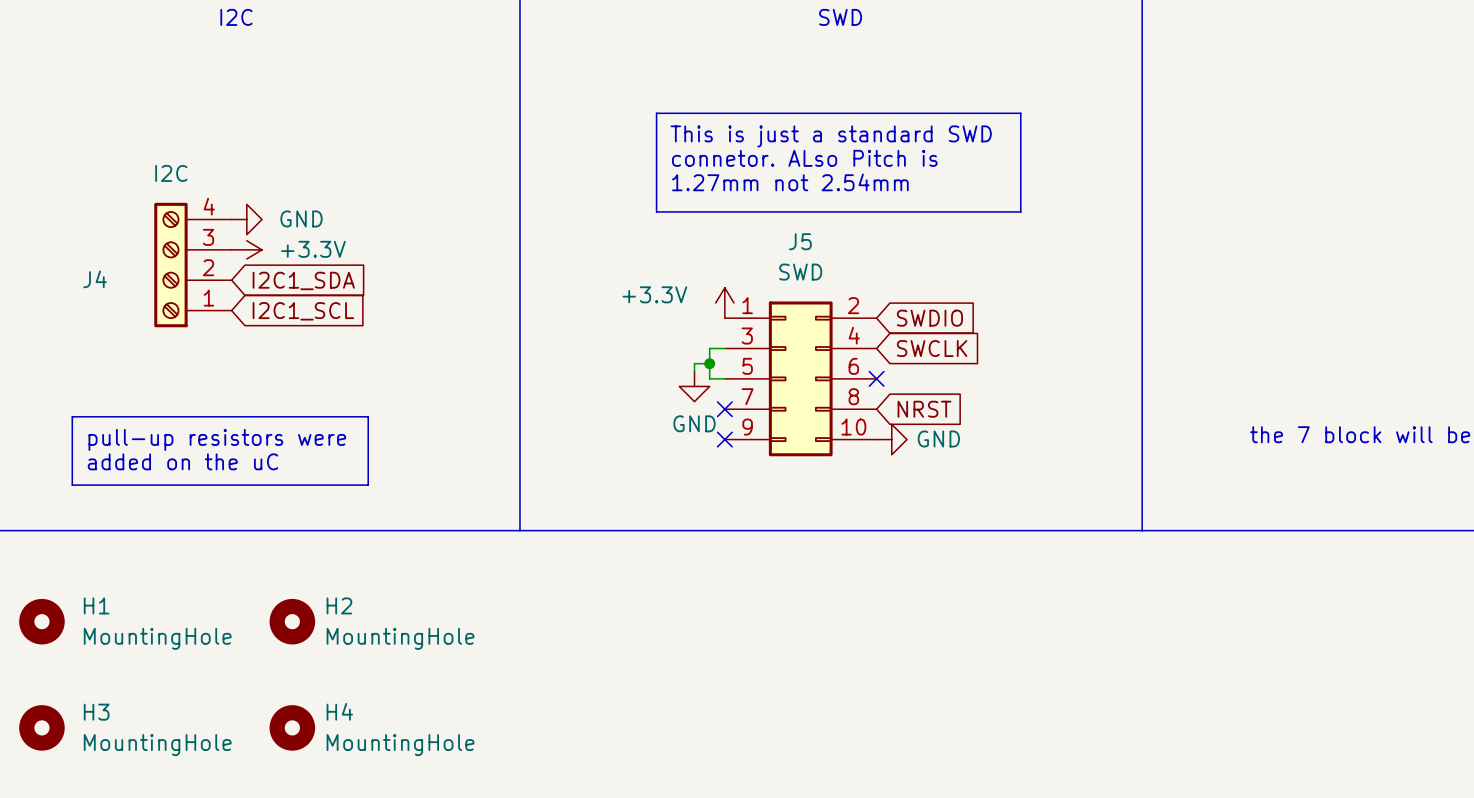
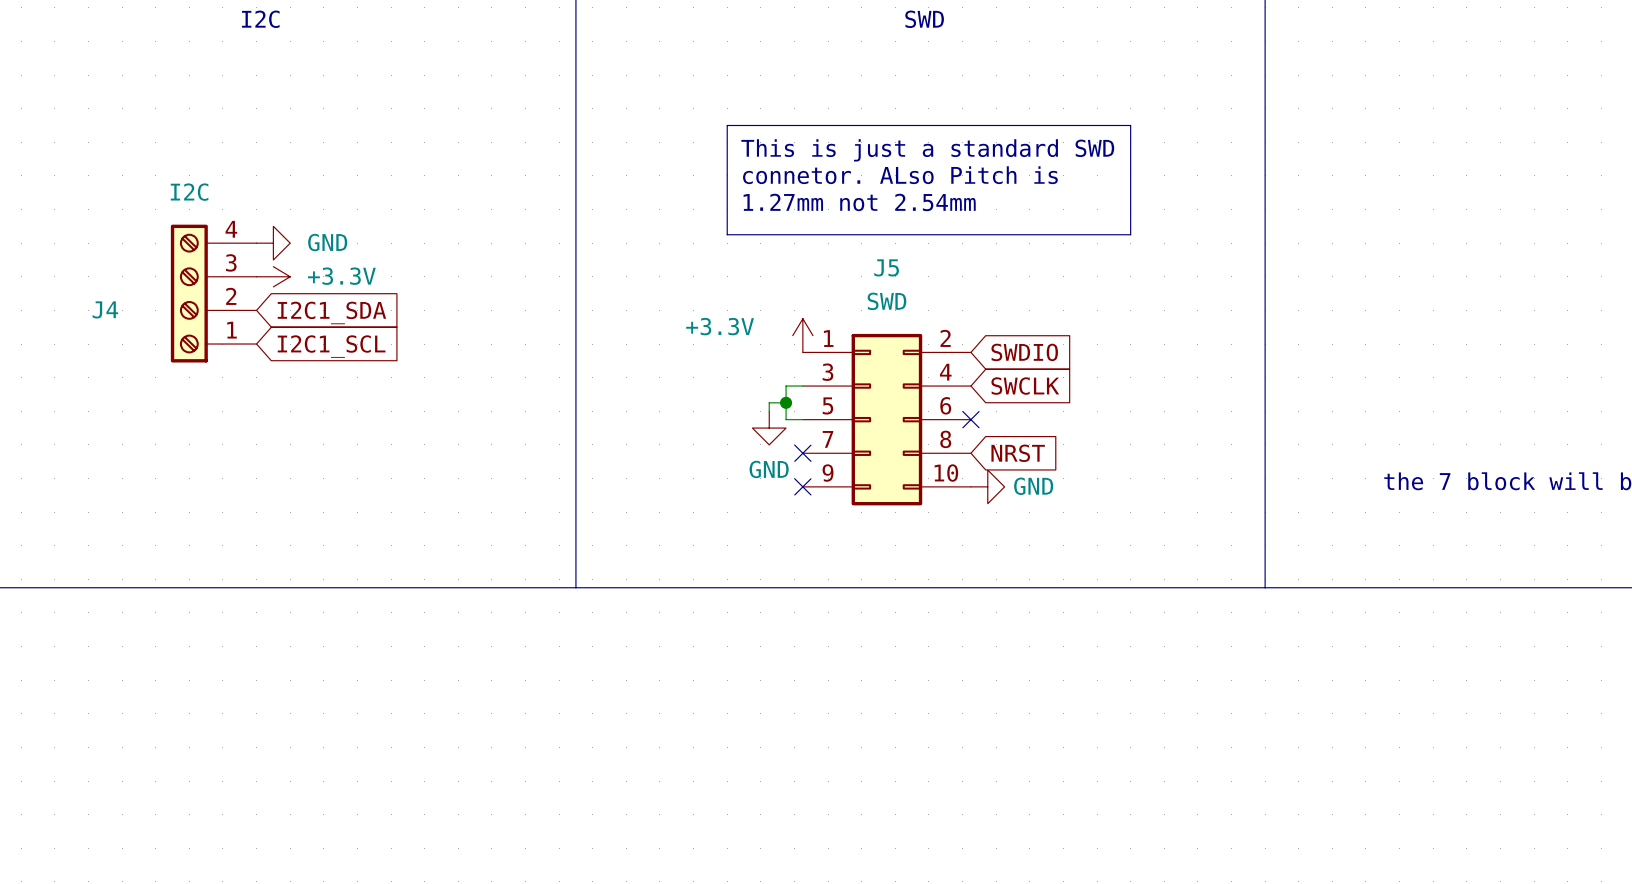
line: (72, 416) (368, 416) (368, 485) (72, 485) (72, 416) -> none
text: pull-up resistors were (217, 439) -> none
text: added on the uC (182, 461) -> none
H1: MountingHole (41, 621) -> none
H2: MountingHole (292, 621) -> none
H3: MountingHole (41, 727) -> none
H4: MountingHole (292, 727) -> none

